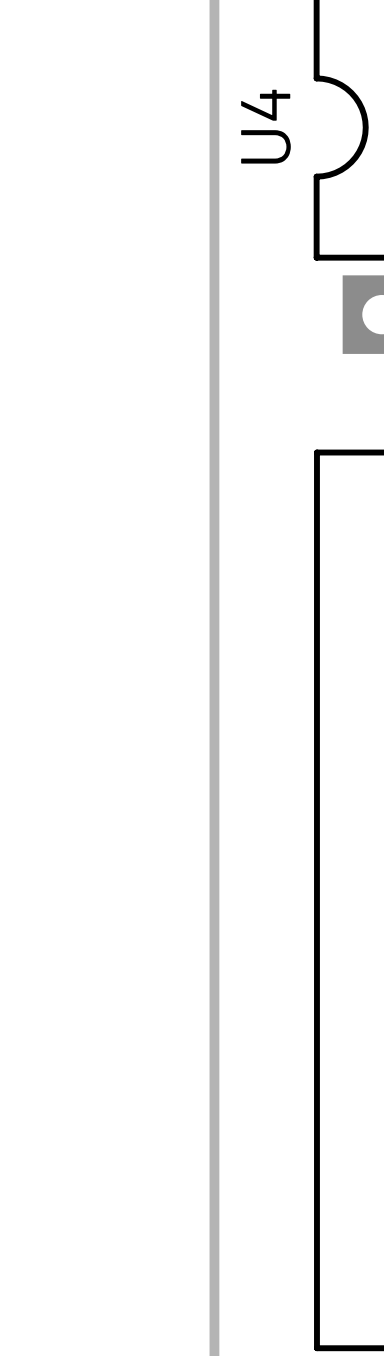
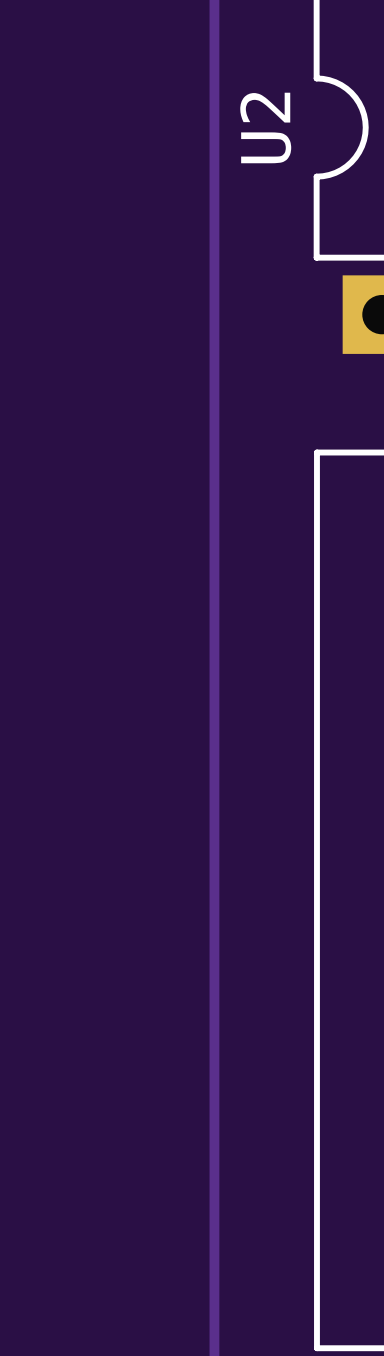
U4 name: U4 (265, 126) -> U2 (265, 127)

